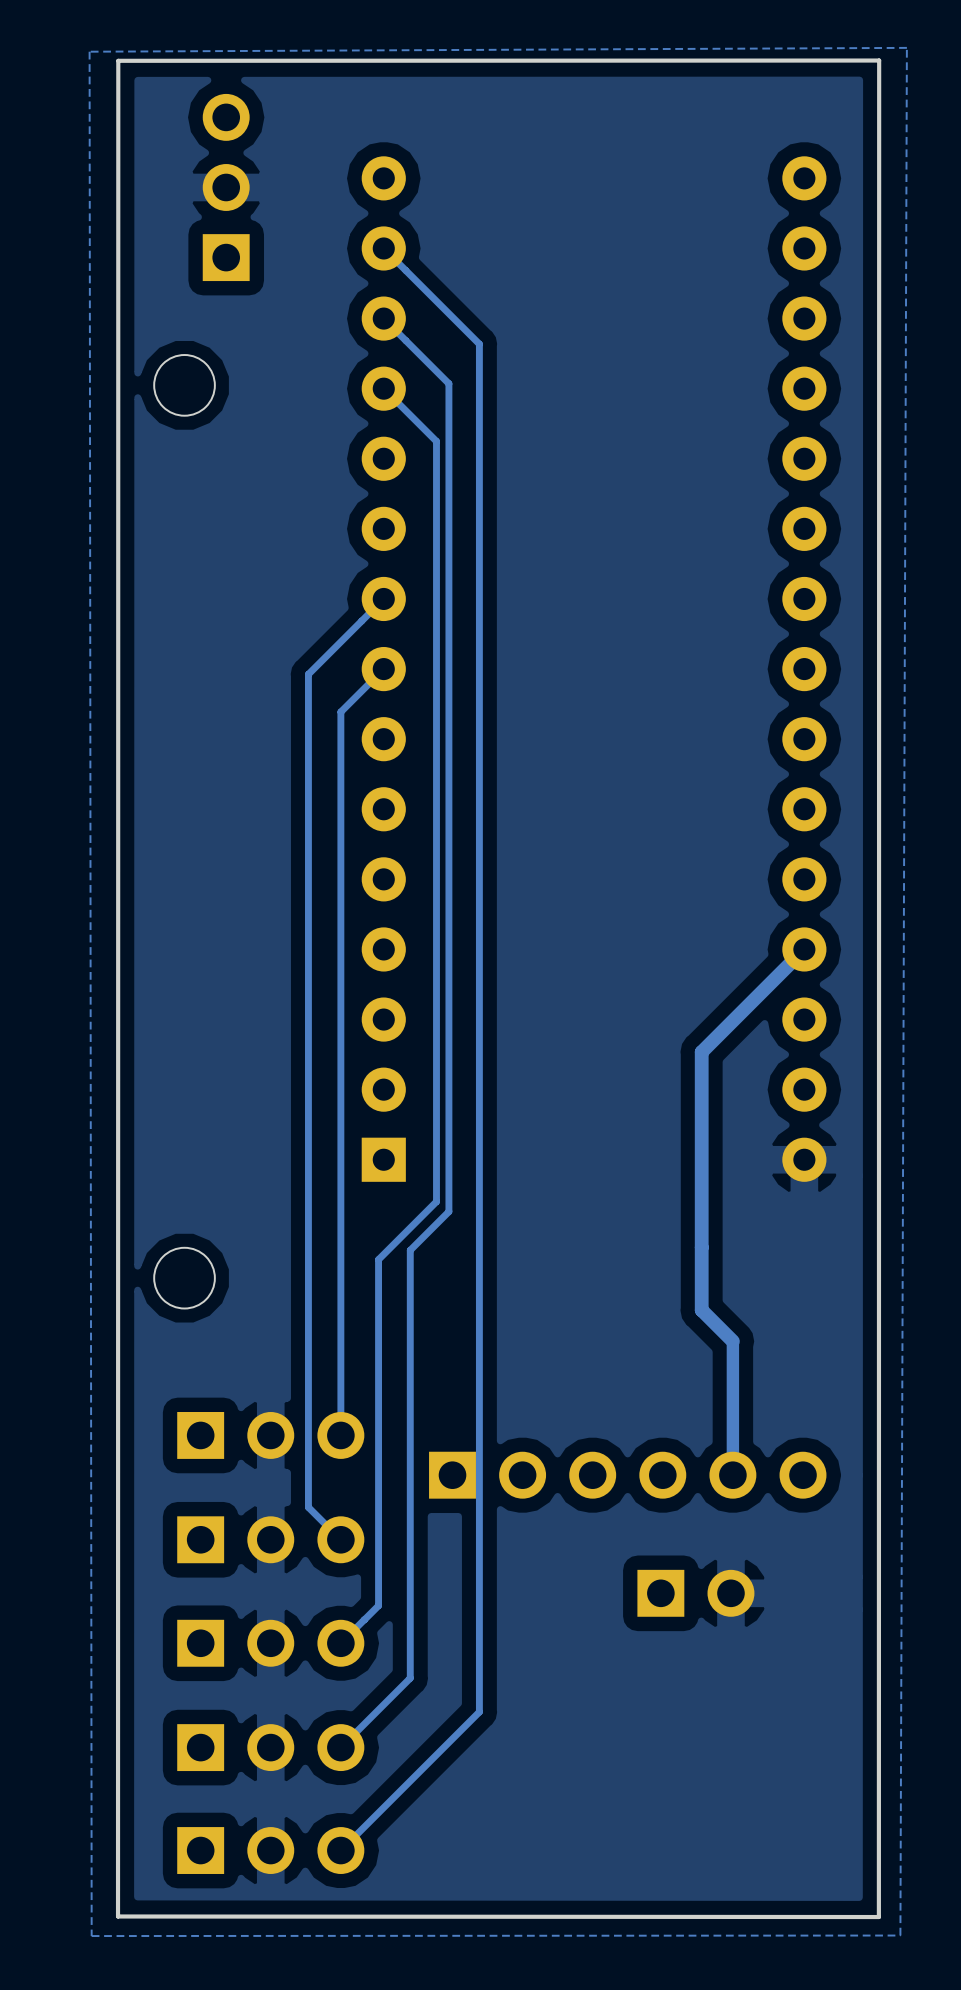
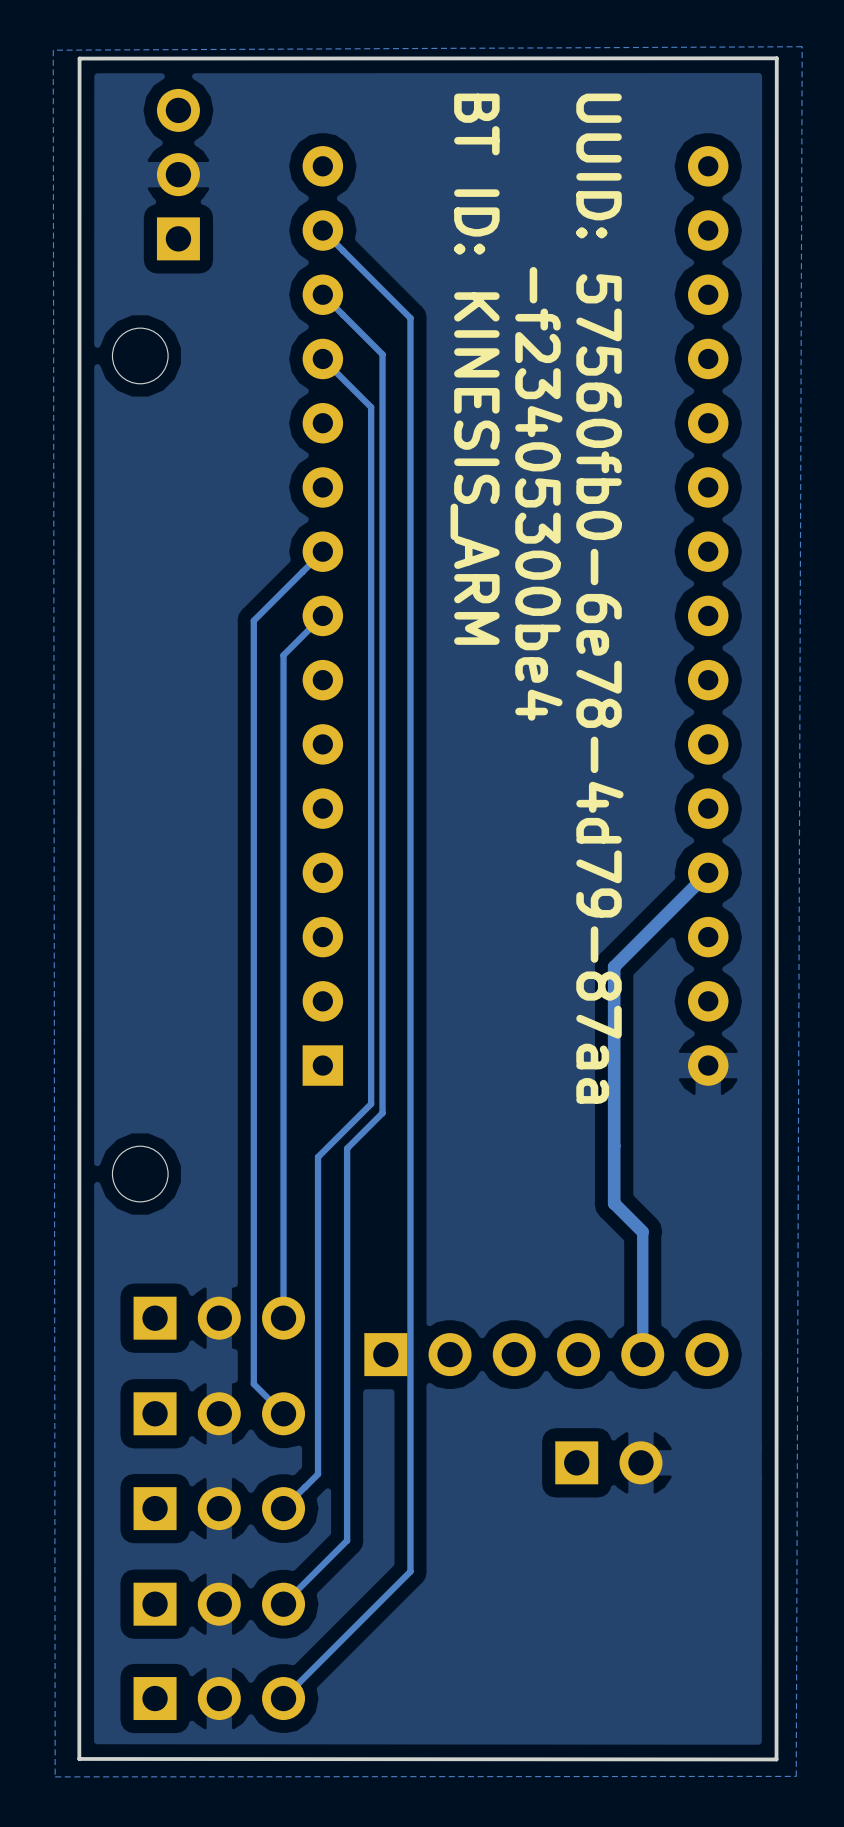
text: none -> BT ID: KINESIS_ARM (475, 369)
text: none -> -f23405300be4 (538, 493)
text: none -> UUID: 57560fb0-6e78-4d79-87aa (599, 598)

